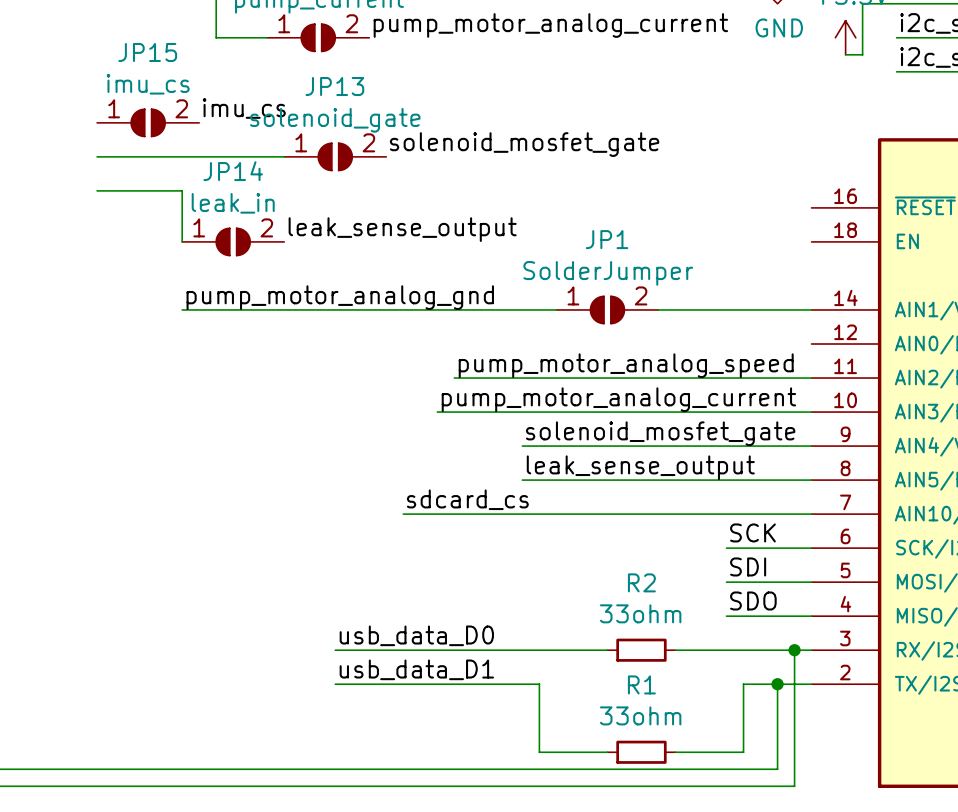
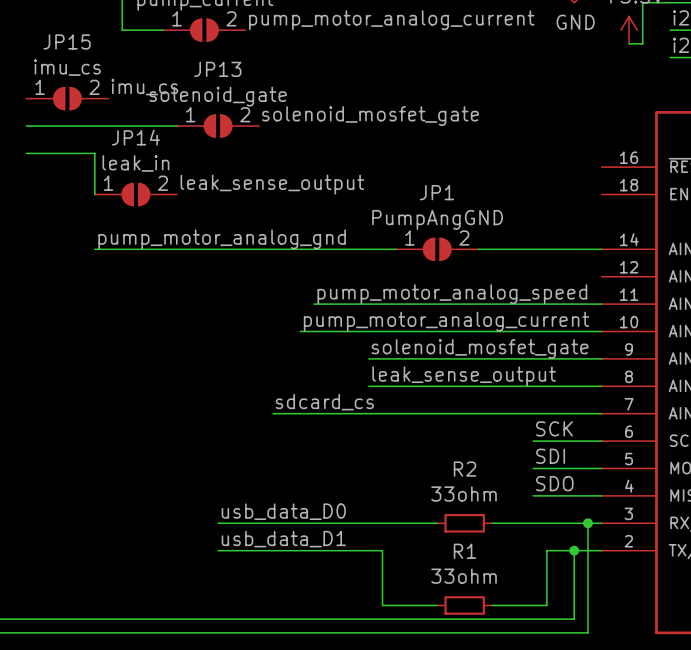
JP1 value: SolderJumper (608, 273) -> PumpAngGND (437, 219)

